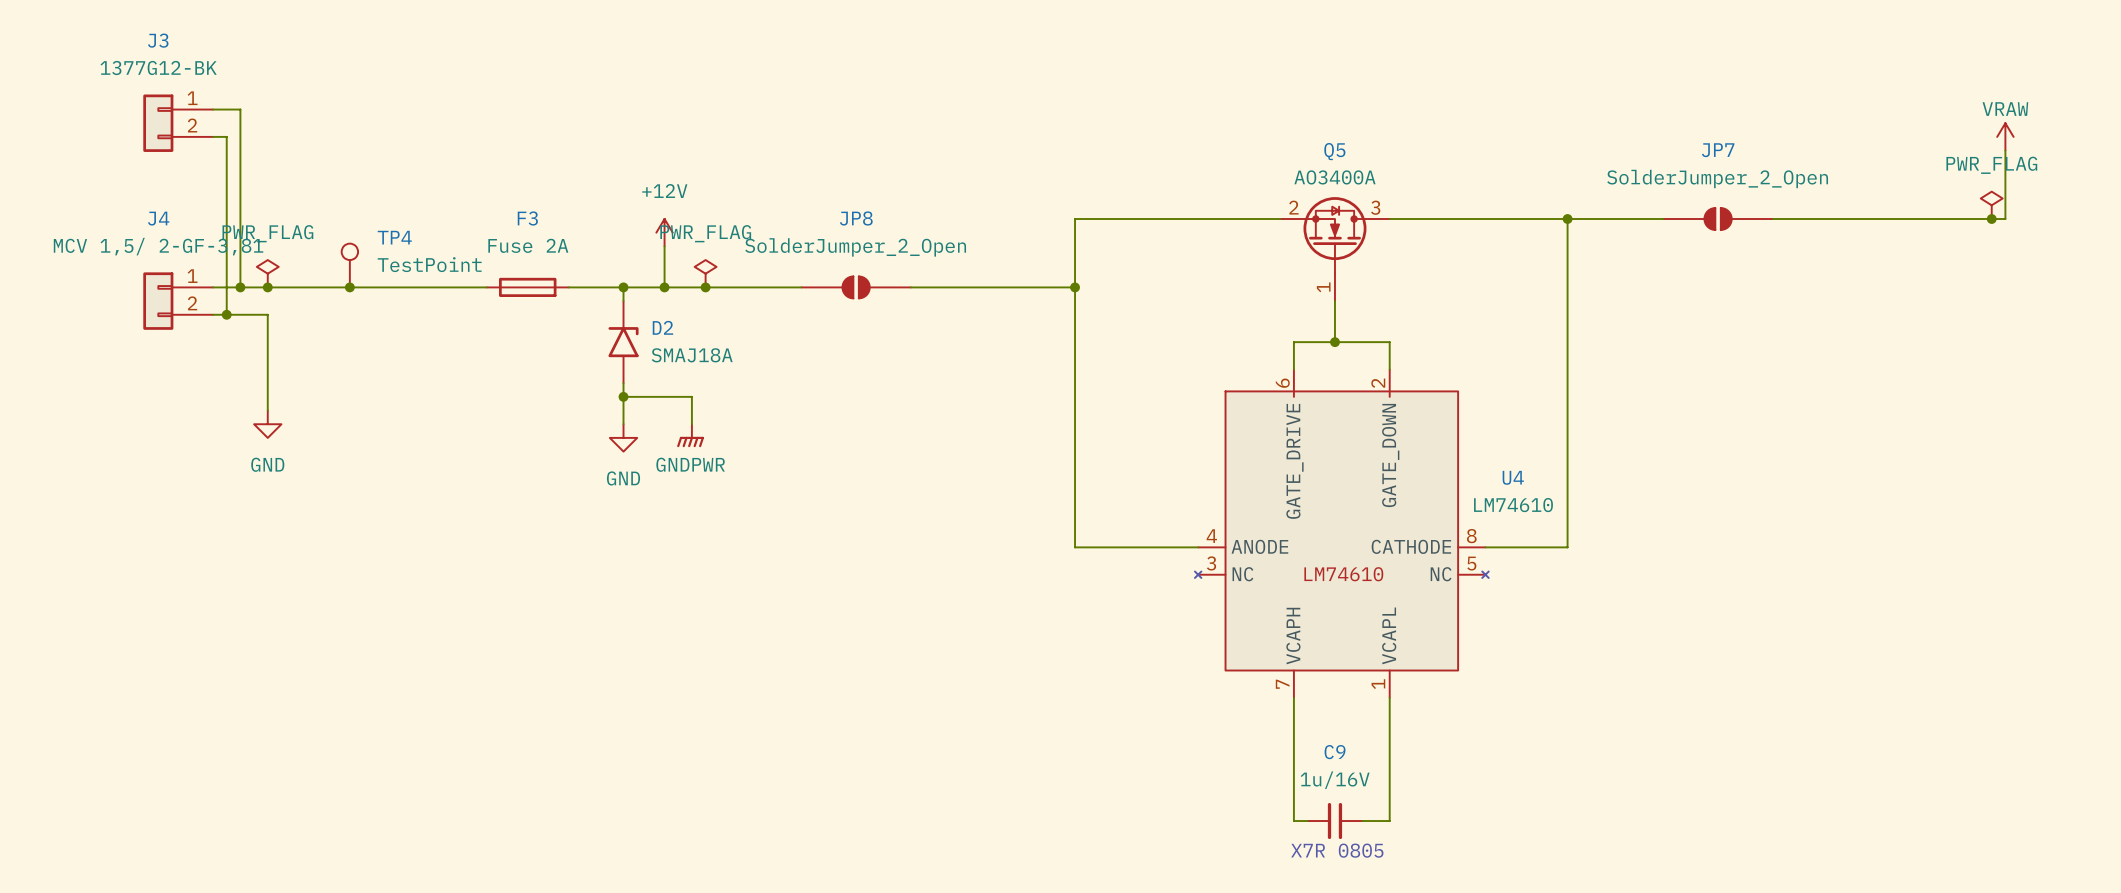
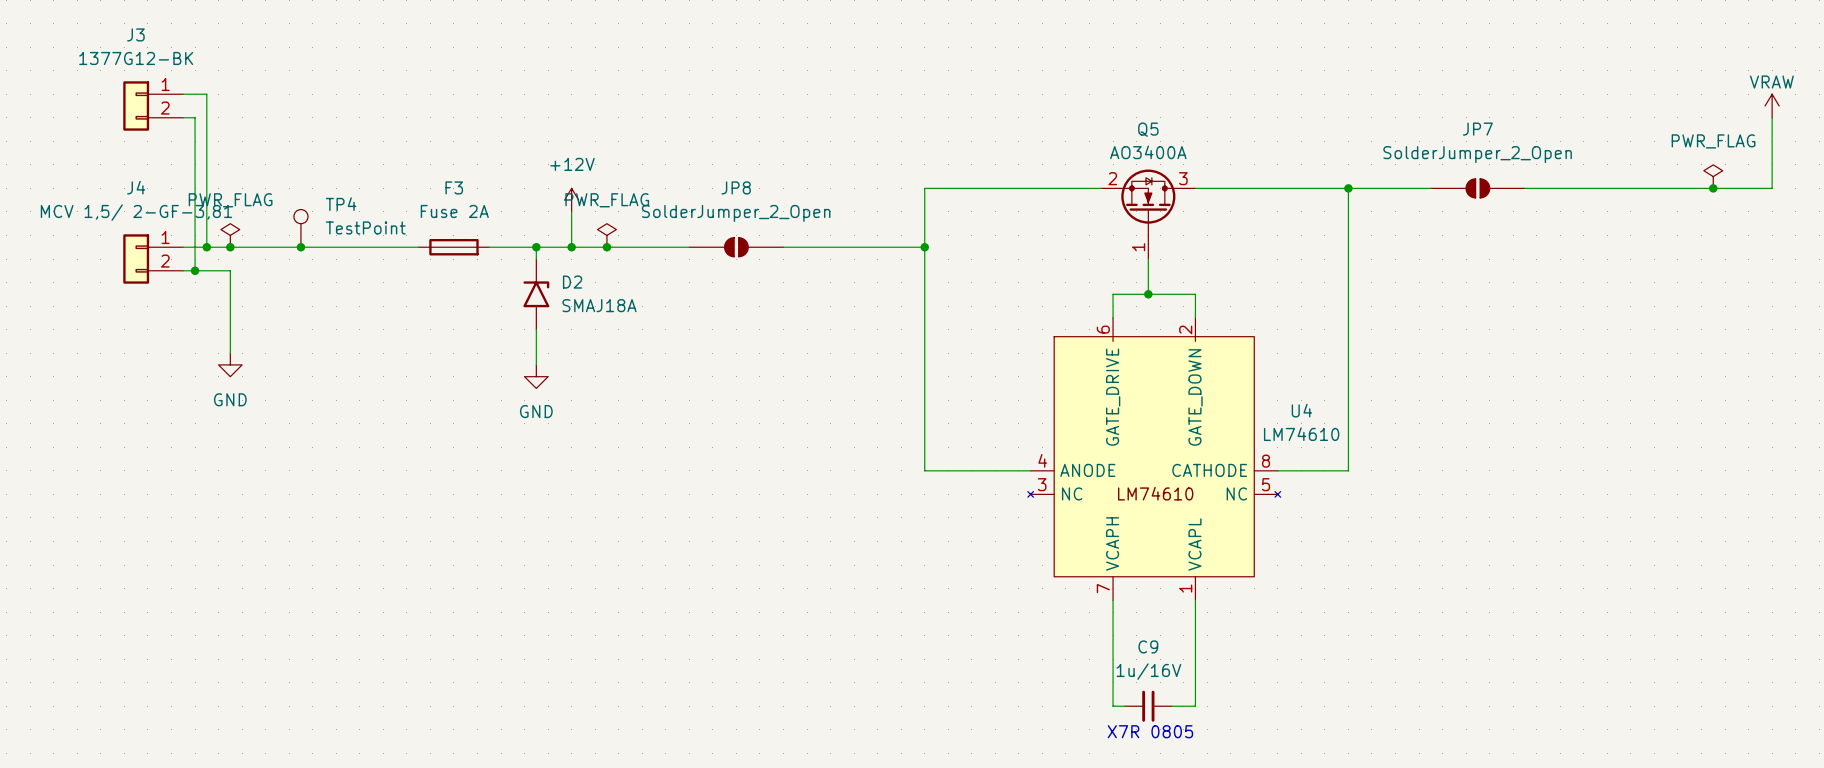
power symbol position: VRAW (2005, 136) -> VRAW (1772, 106)
wire: (2005, 150) (2005, 219) -> (1772, 117) (1772, 188) (1725, 188)
wire: (623, 396) (691, 396) (691, 424) -> none
junction: (623, 396) -> none
power symbol: GNDPWR (690, 435) -> none

